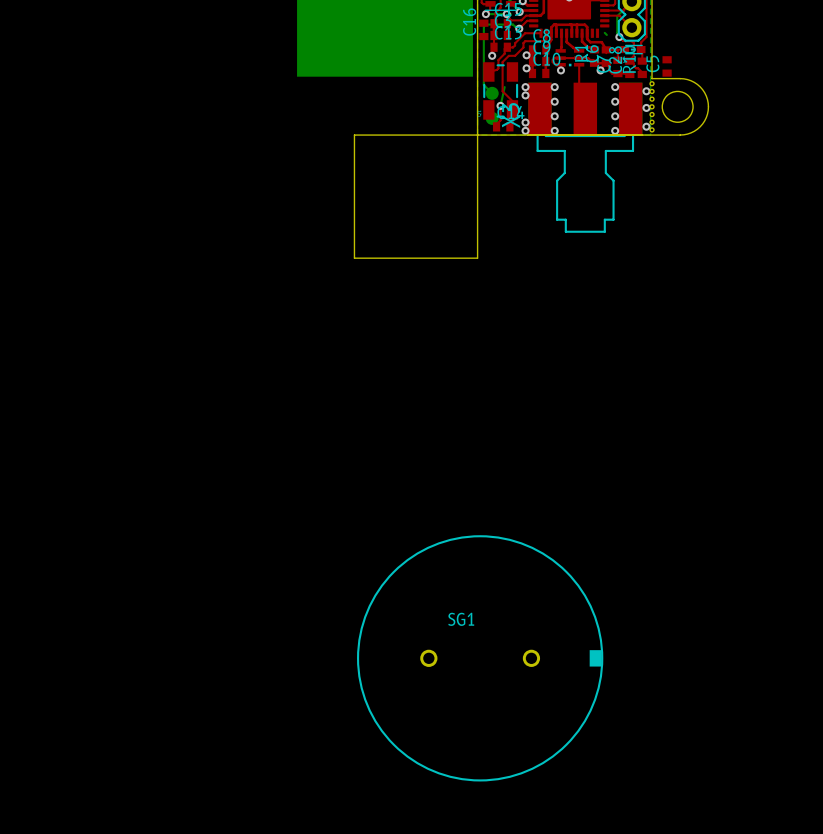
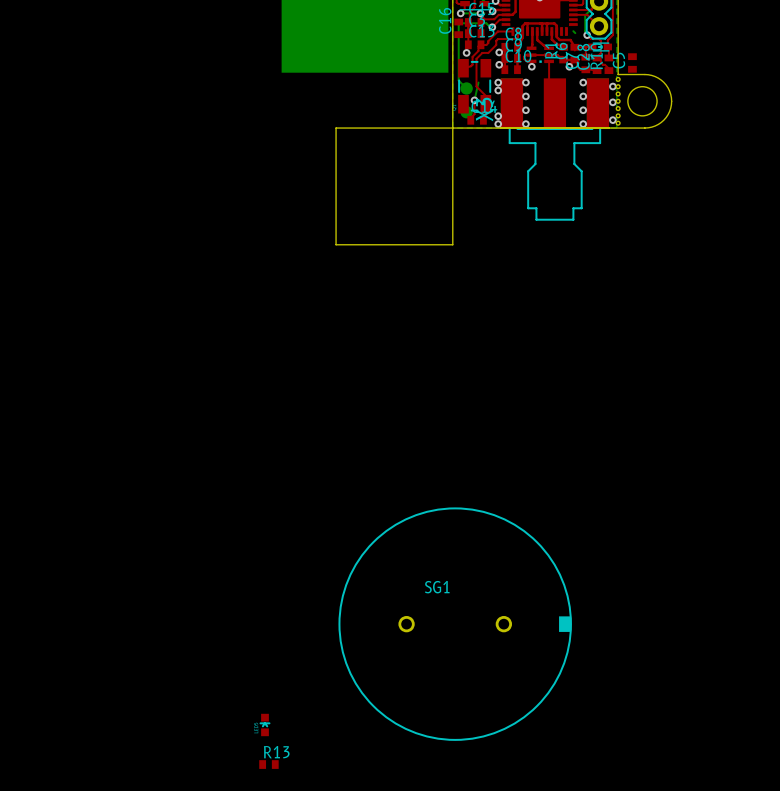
part: none -> (264, 724)
R13: none -> (268, 764)

